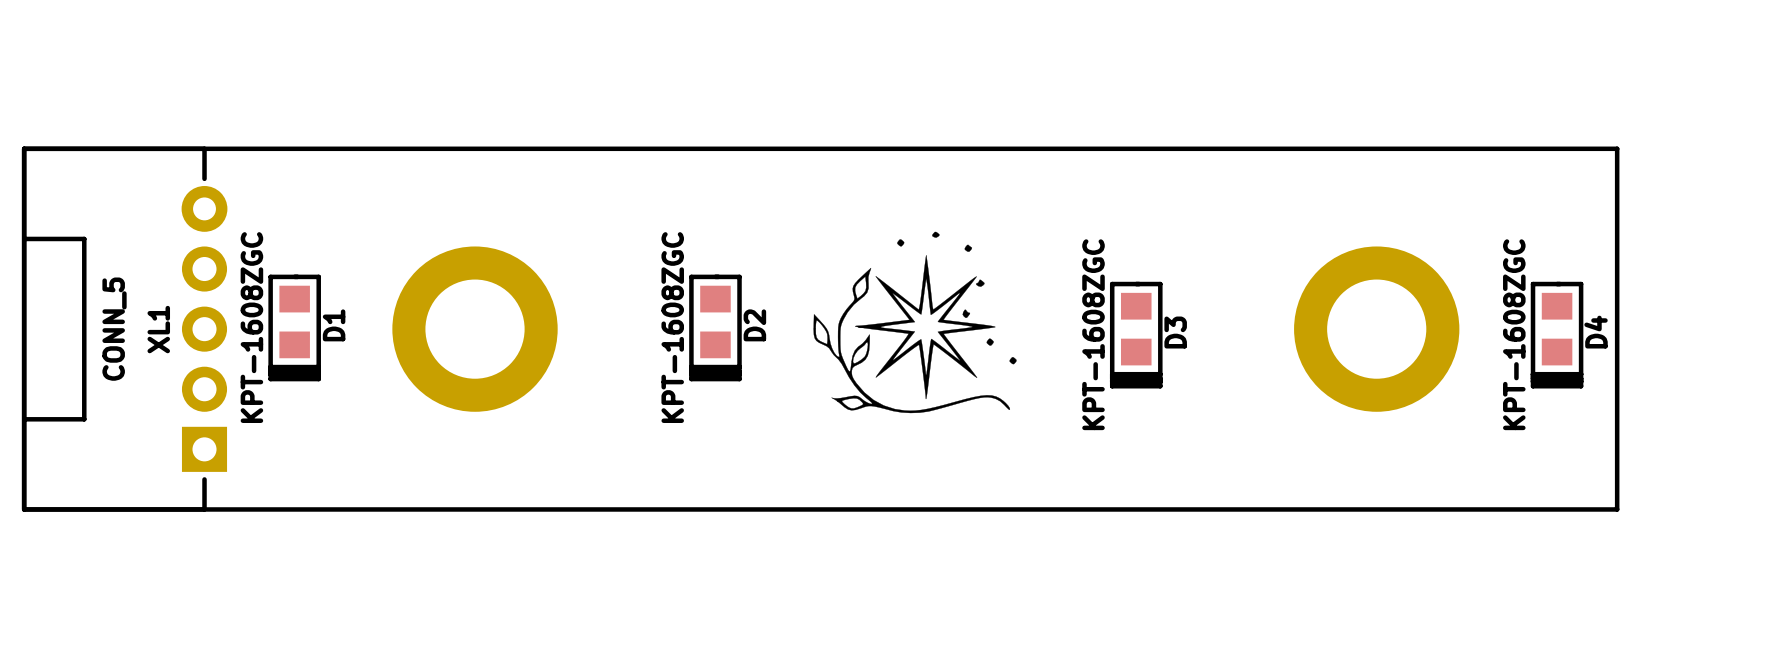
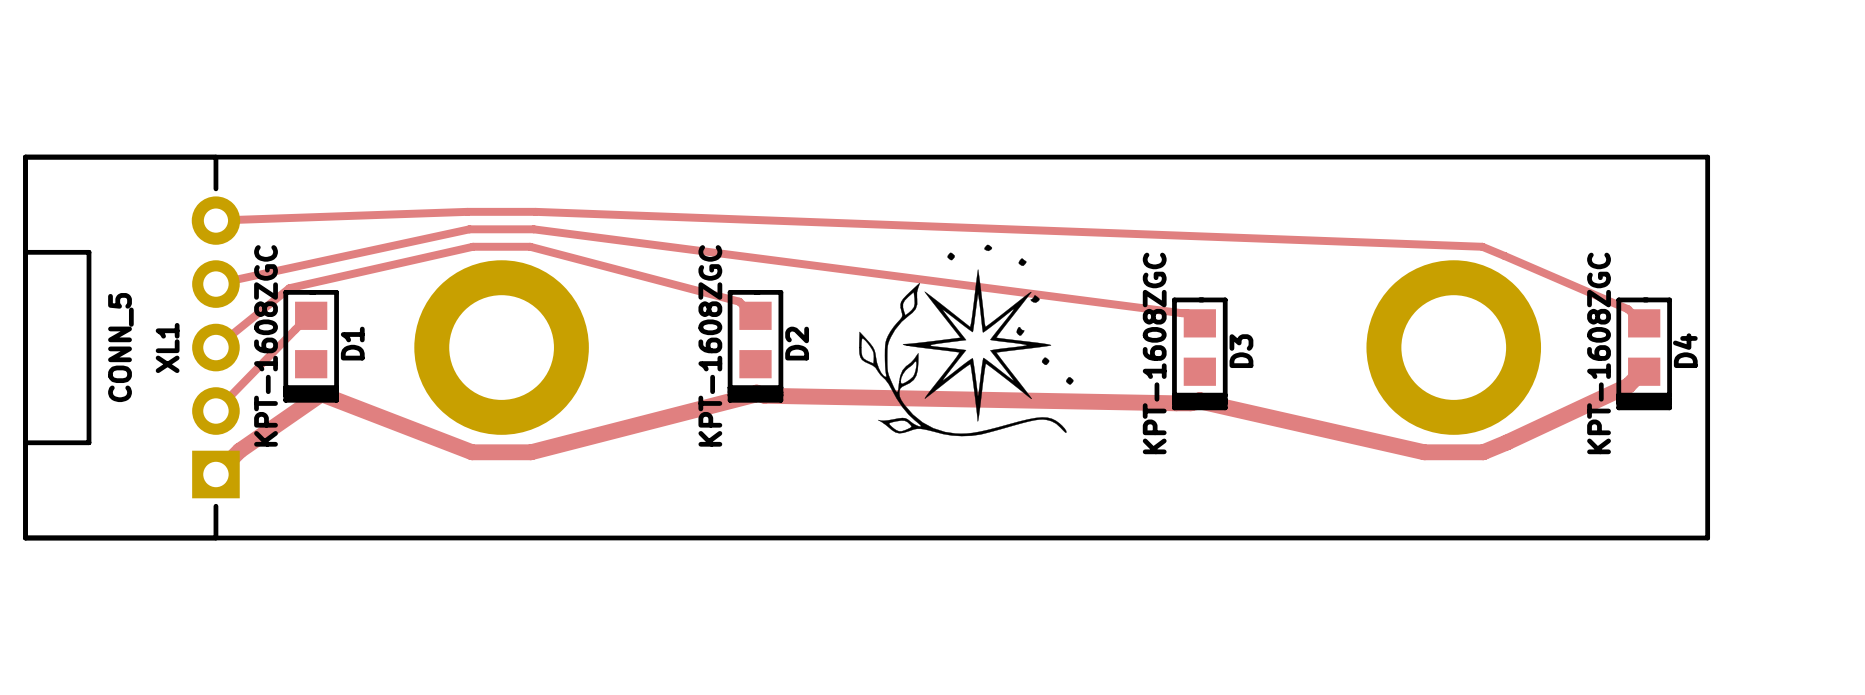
track: none -> (215, 220) (467, 211) (535, 211) (1482, 246) (1628, 309) (1644, 323)
track: none -> (215, 284) (469, 229) (533, 229) (1187, 313) (1199, 323)
track: none -> (311, 315) (215, 411)
track: none -> (755, 315) (739, 301) (530, 246) (472, 246) (289, 288) (215, 347)
track: none -> (1644, 371) (1628, 385) (1483, 452) (1424, 452) (1199, 400) (1190, 403) (1176, 403) (764, 395) (756, 392) (754, 394) (531, 452) (472, 452) (321, 394) (239, 450) (215, 474)

